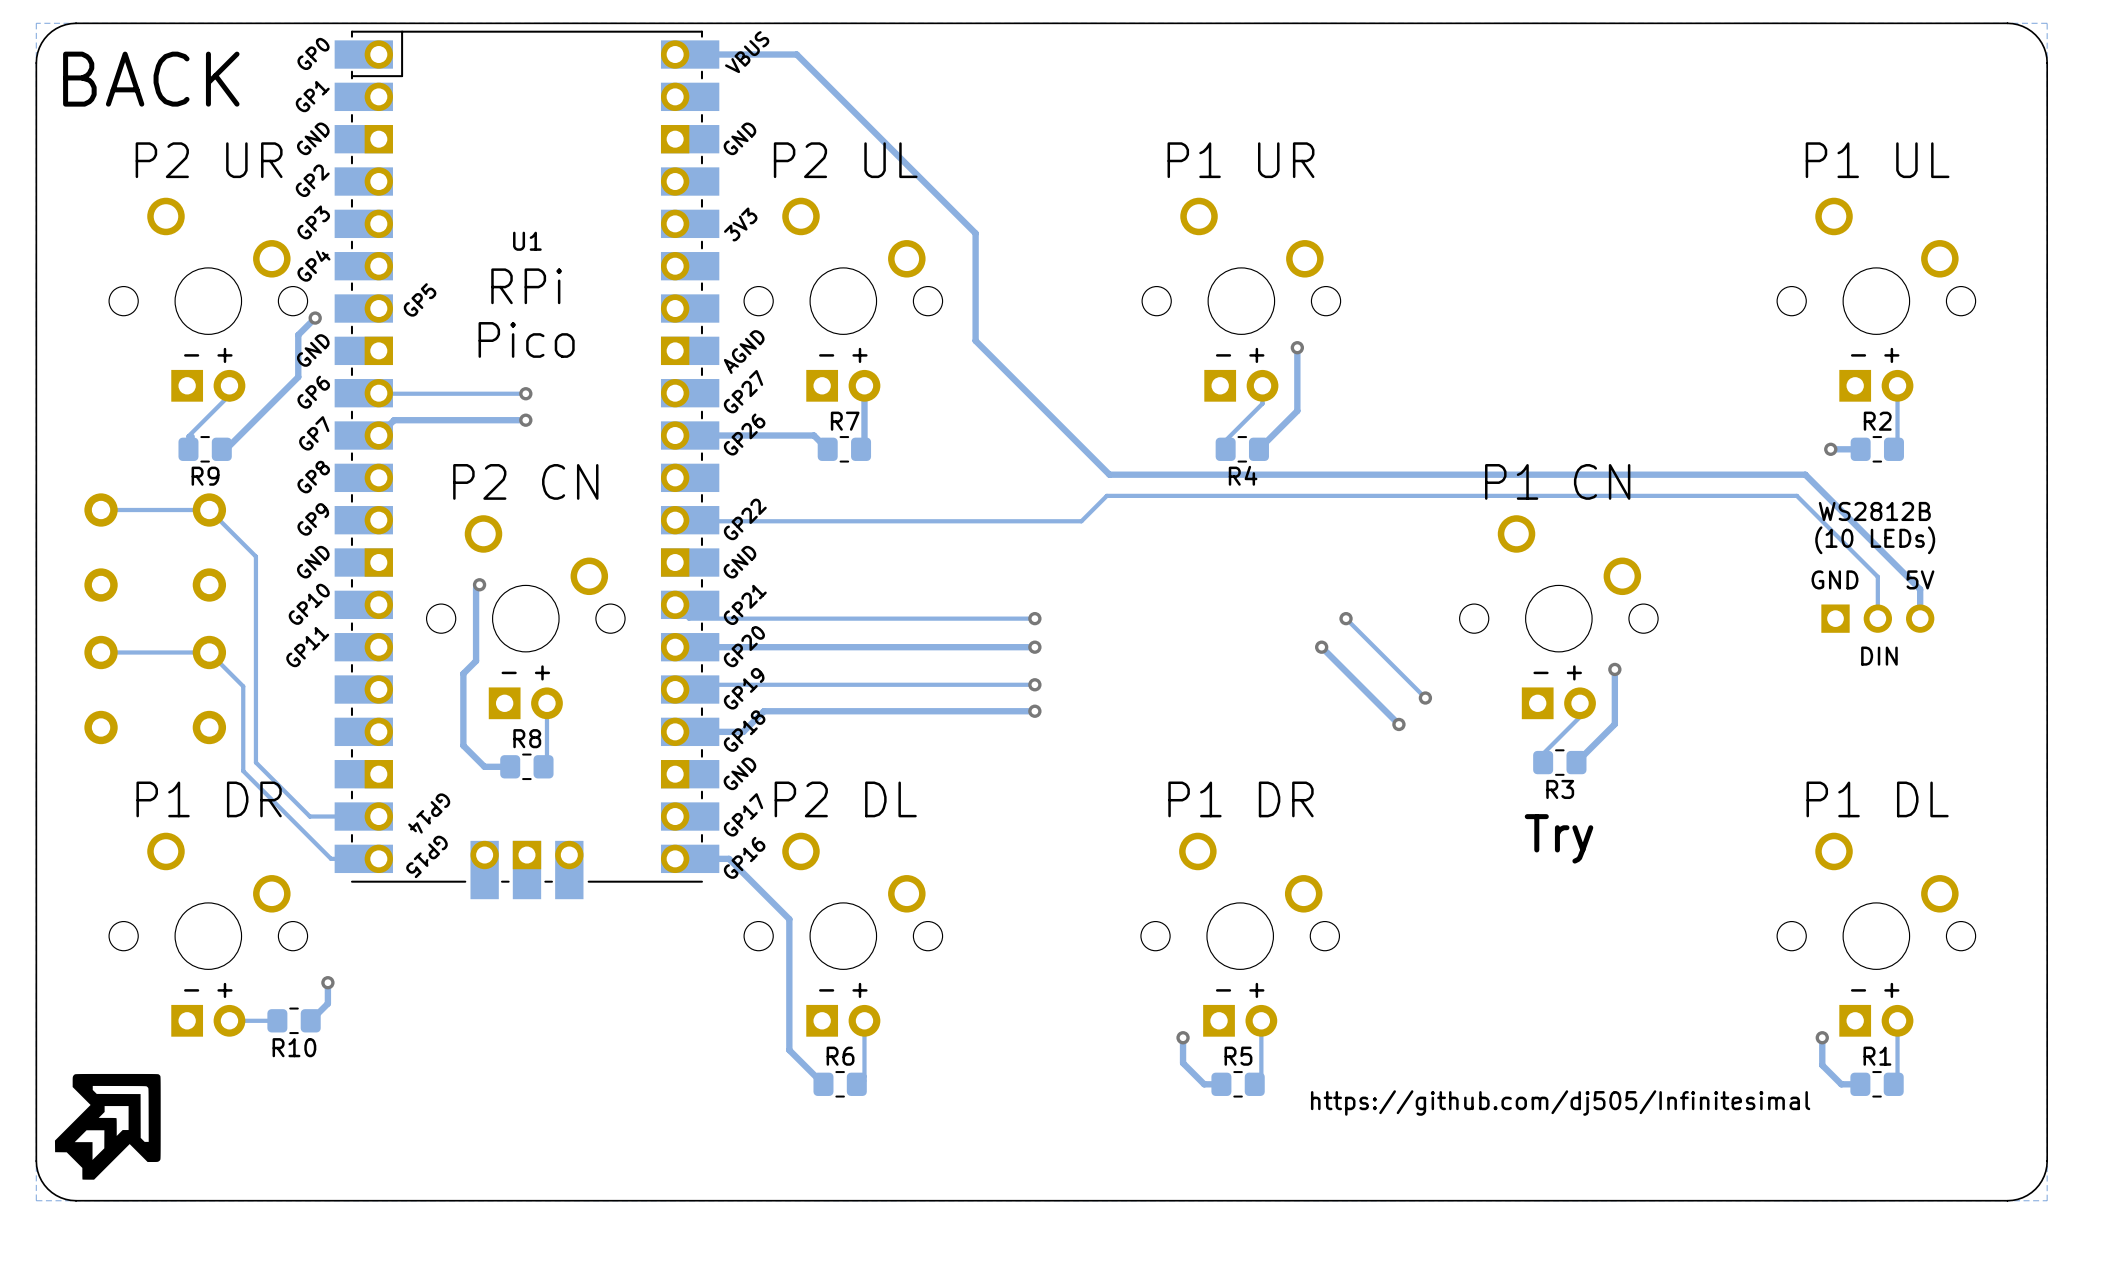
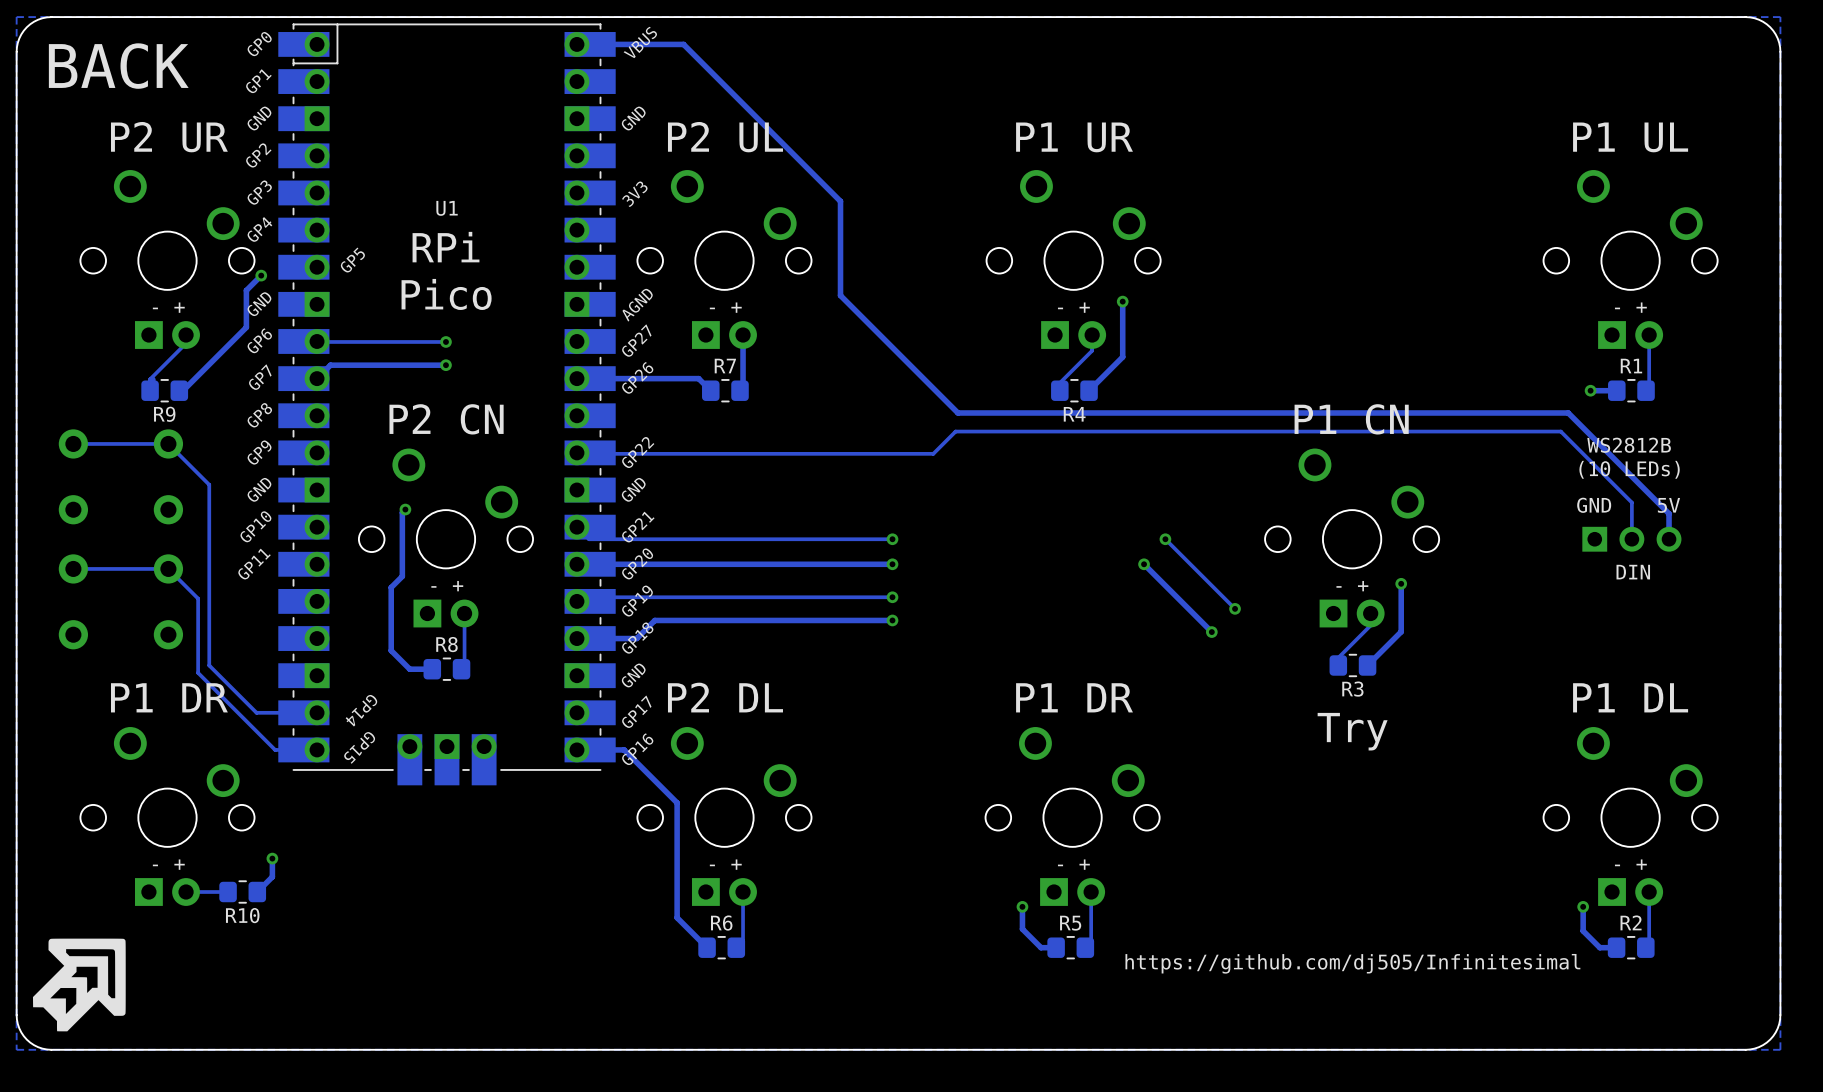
R2 name: R2 (1877, 421) -> R1 (1631, 366)
R1 name: R1 (1877, 1056) -> R2 (1631, 922)

